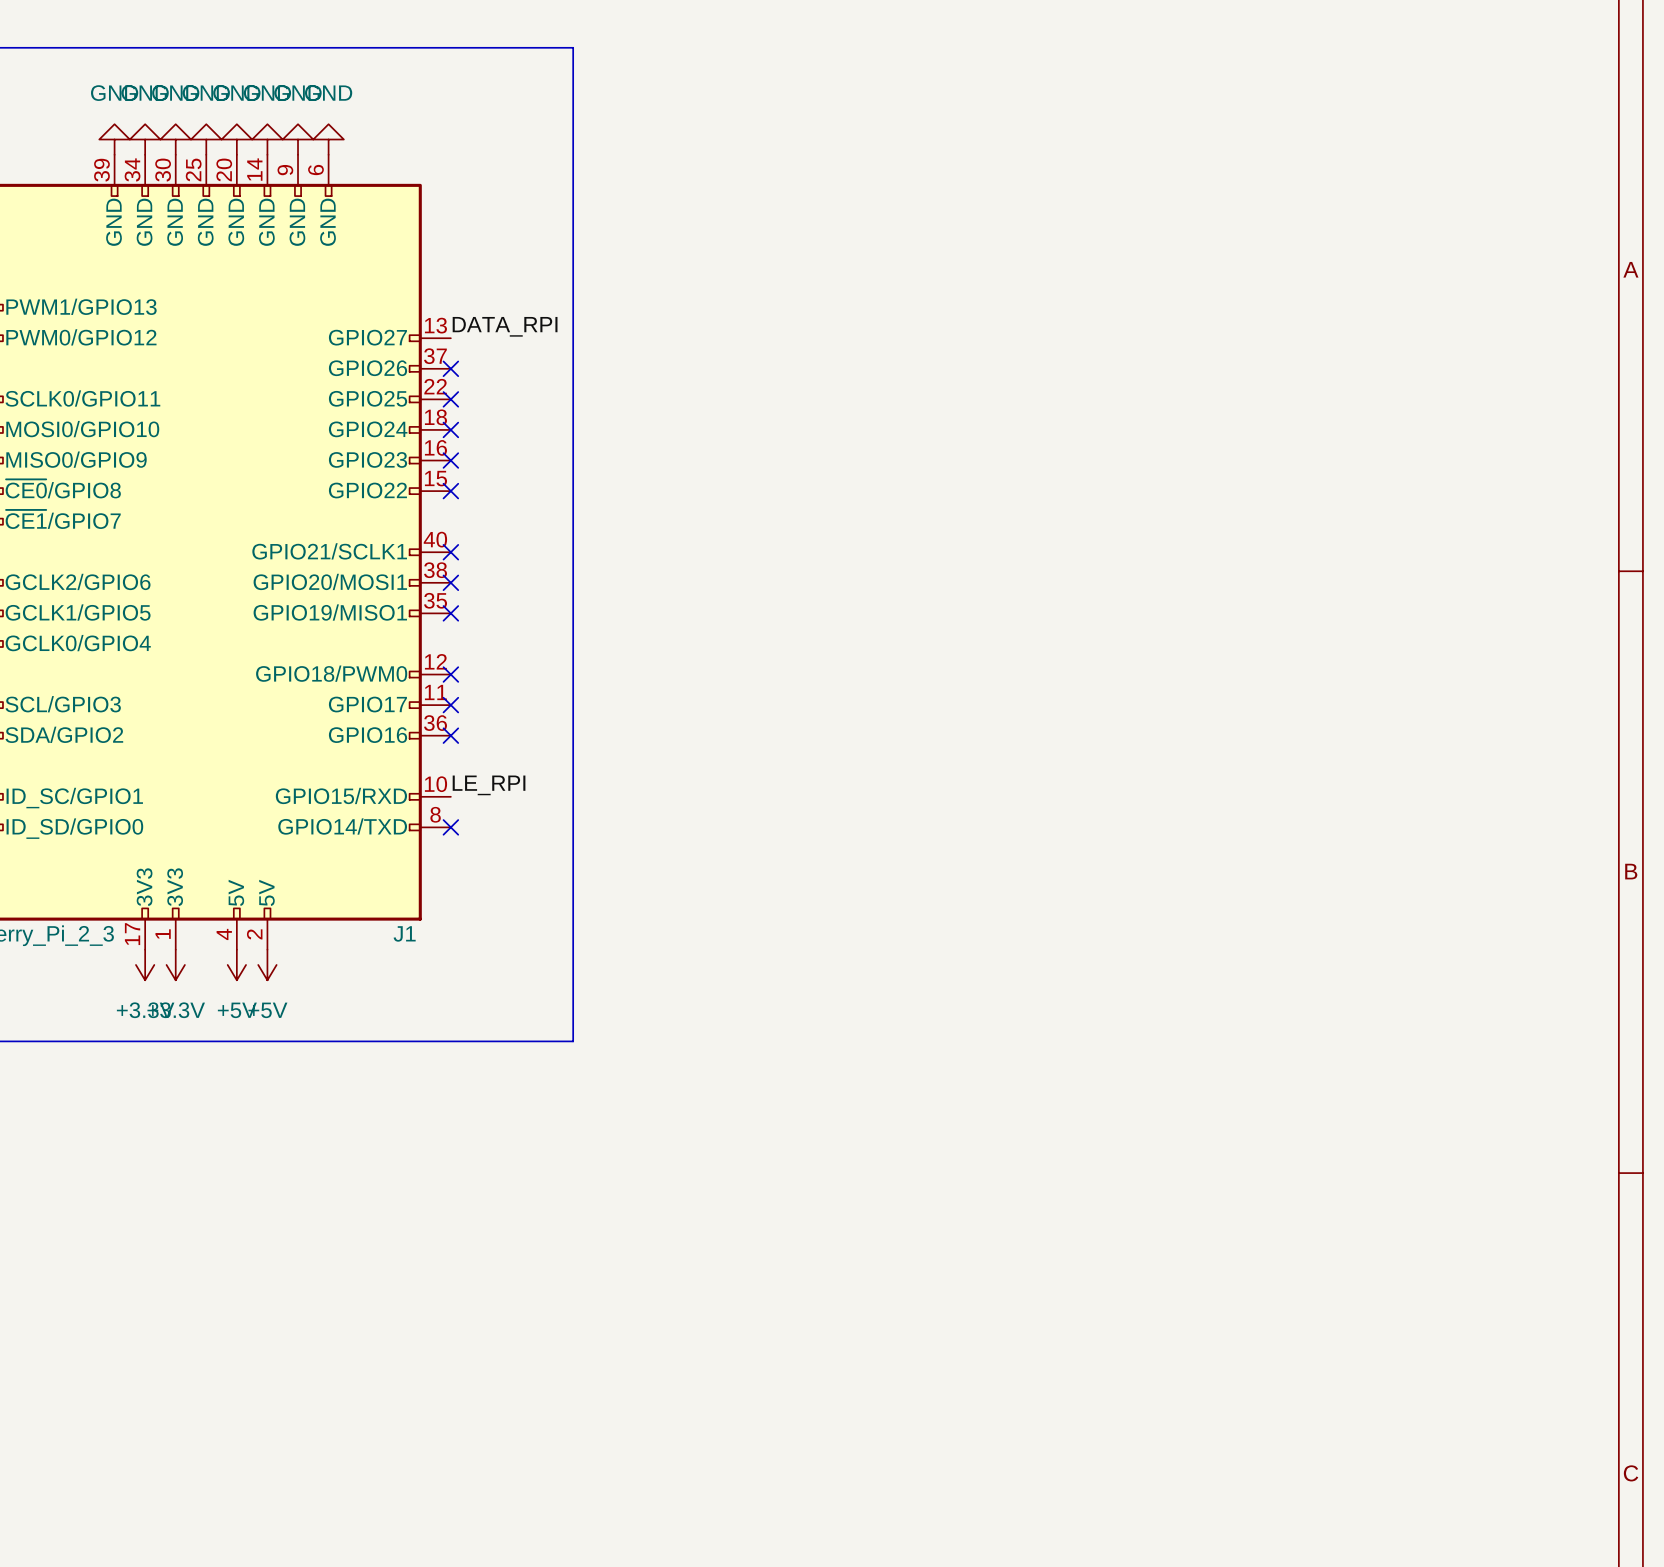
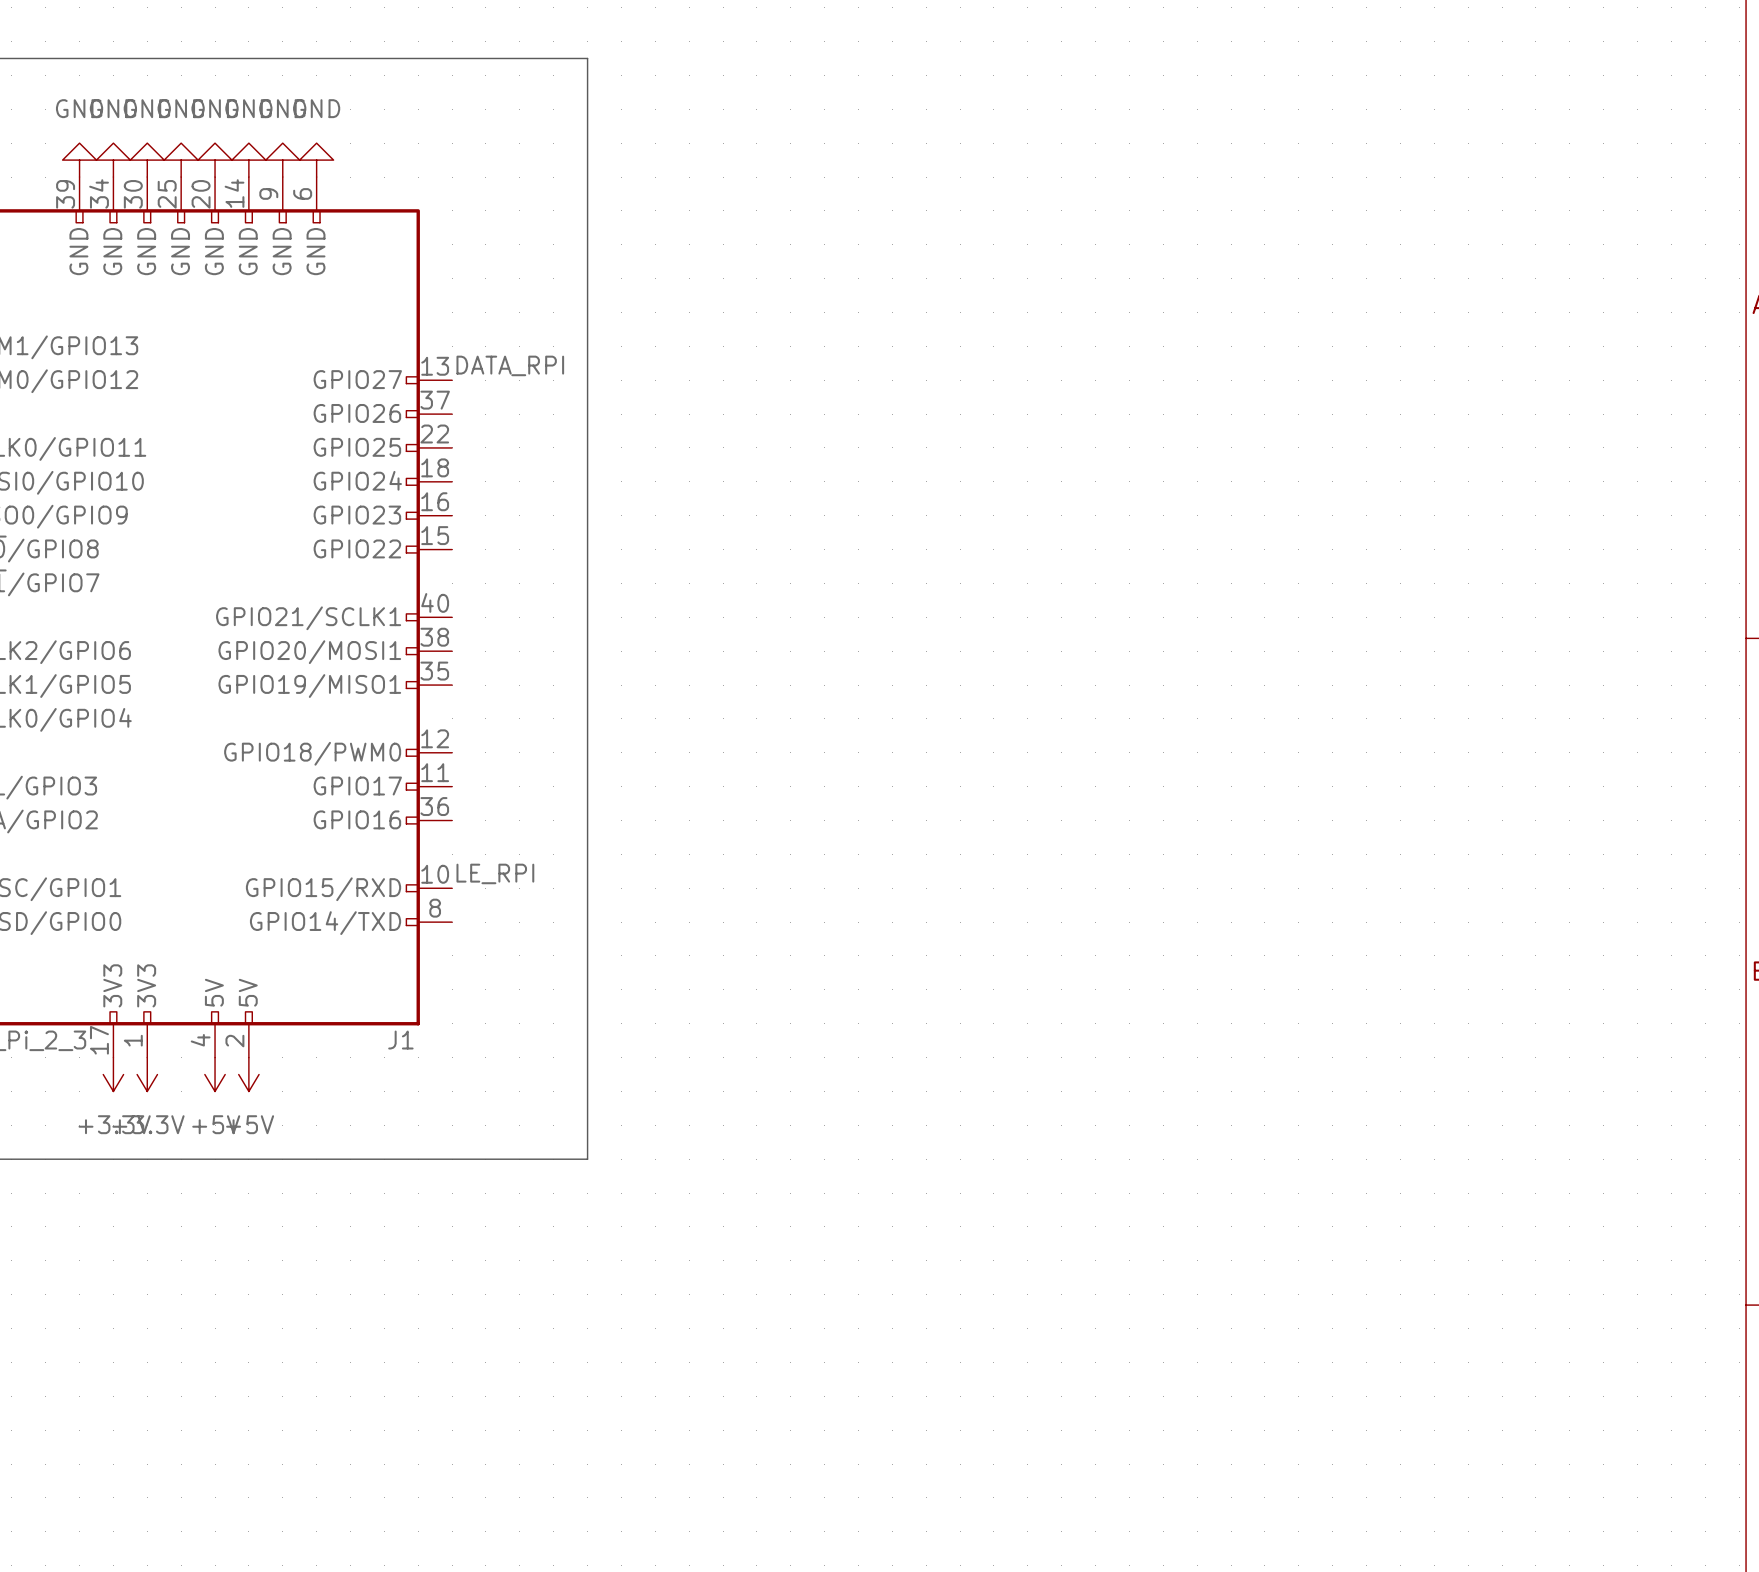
no-connect mark: (450, 368) -> none
no-connect mark: (450, 399) -> none
no-connect mark: (450, 429) -> none
no-connect mark: (450, 460) -> none
no-connect mark: (450, 491) -> none
no-connect mark: (450, 552) -> none
no-connect mark: (450, 582) -> none
no-connect mark: (450, 613) -> none
no-connect mark: (450, 674) -> none
no-connect mark: (450, 705) -> none
no-connect mark: (450, 735) -> none
no-connect mark: (450, 827) -> none

